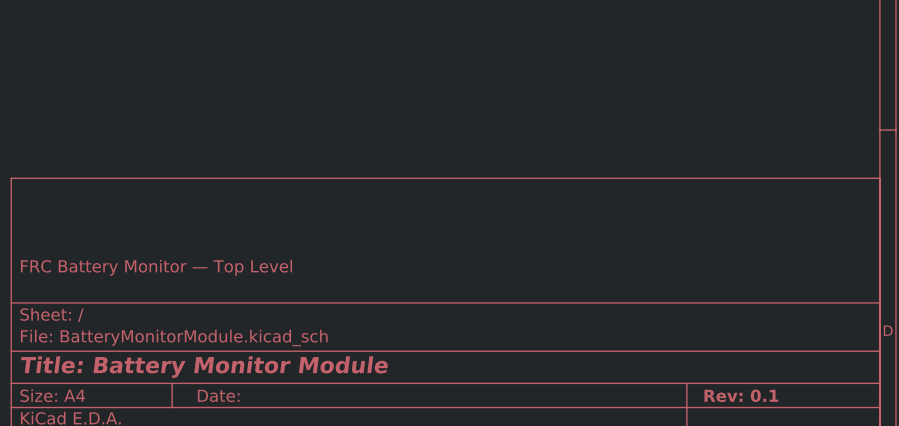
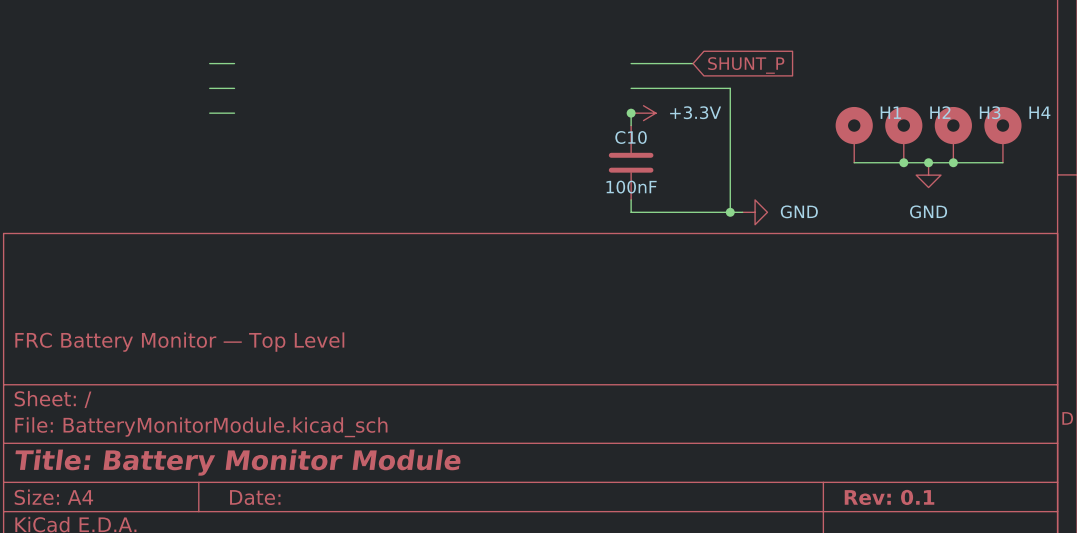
wire: none -> (209, 63) (234, 63)
wire: none -> (631, 63) (693, 63)
global label: none -> SHUNT_P (746, 65)
wire: none -> (209, 88) (234, 88)
wire: none -> (631, 88) (730, 88) (730, 212)
wire: none -> (209, 113) (234, 113)
wire: none -> (631, 113) (631, 125)
junction: none -> (631, 113)
power symbol: none -> +3.3V (643, 113)
H1: none -> (854, 134)
H2: none -> (903, 134)
H3: none -> (953, 134)
H4: none -> (1002, 134)
C10: none -> 100nF (631, 162)
wire: none -> (854, 162) (1002, 162)
junction: none -> (903, 162)
junction: none -> (928, 162)
junction: none -> (953, 162)
power symbol: none -> GND (928, 175)
wire: none -> (631, 199) (631, 212) (742, 212)
junction: none -> (730, 212)
power symbol: none -> GND (755, 212)

